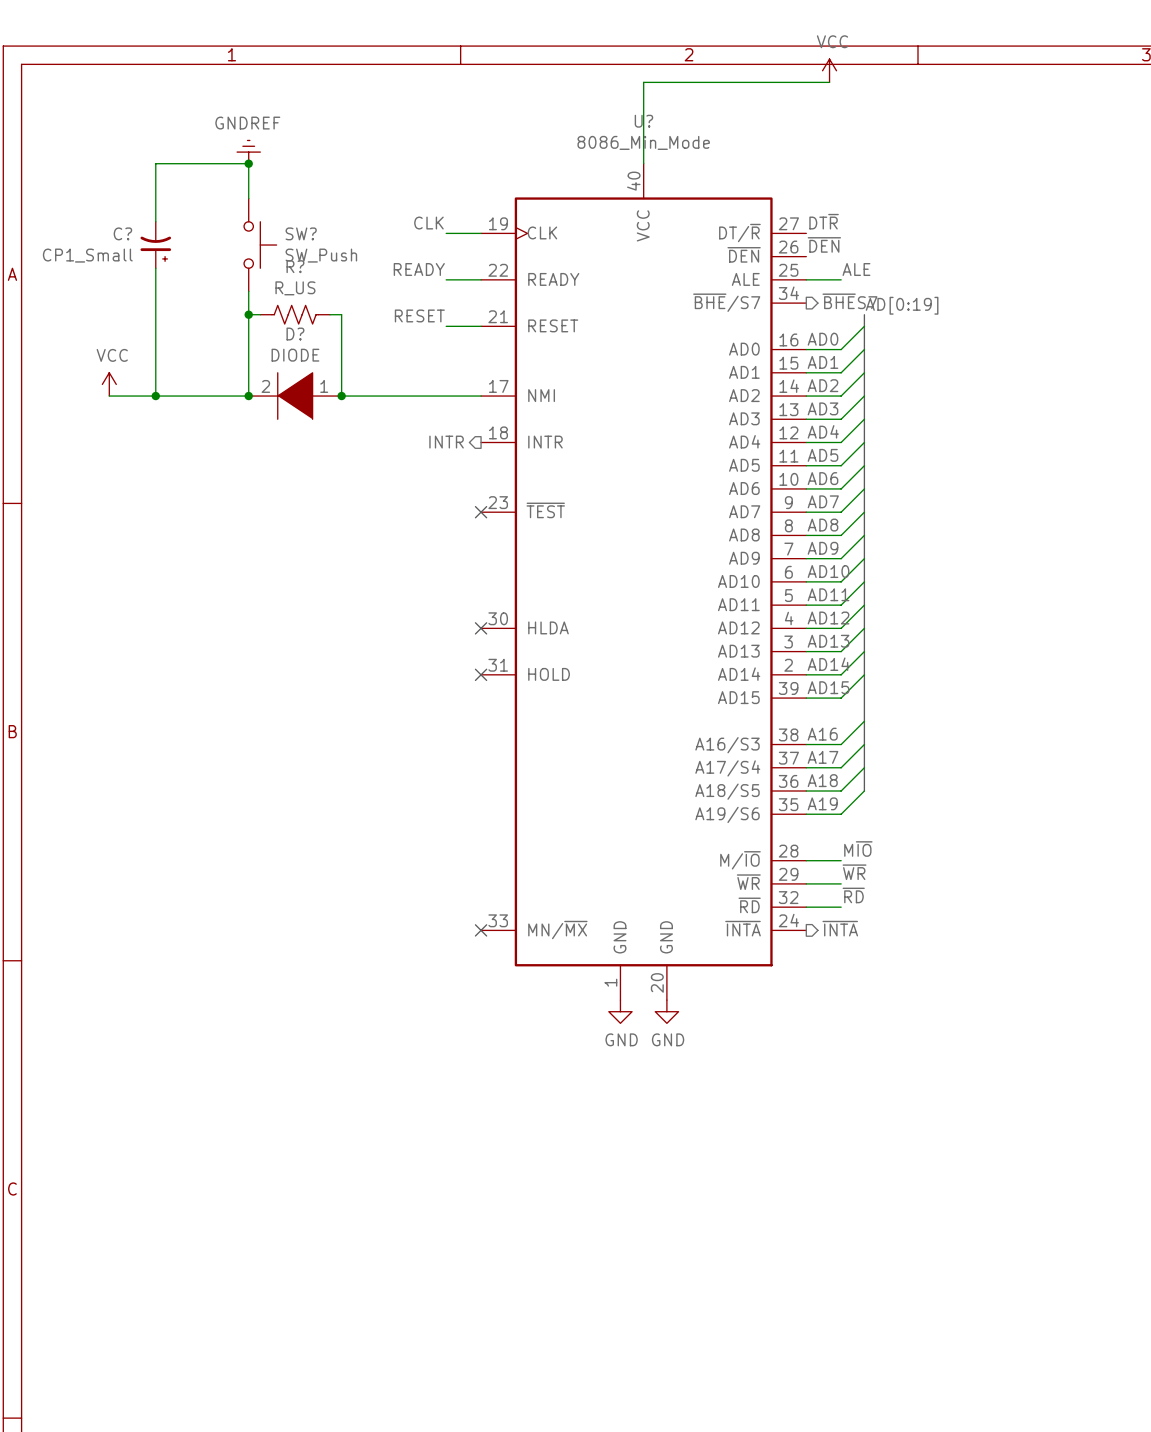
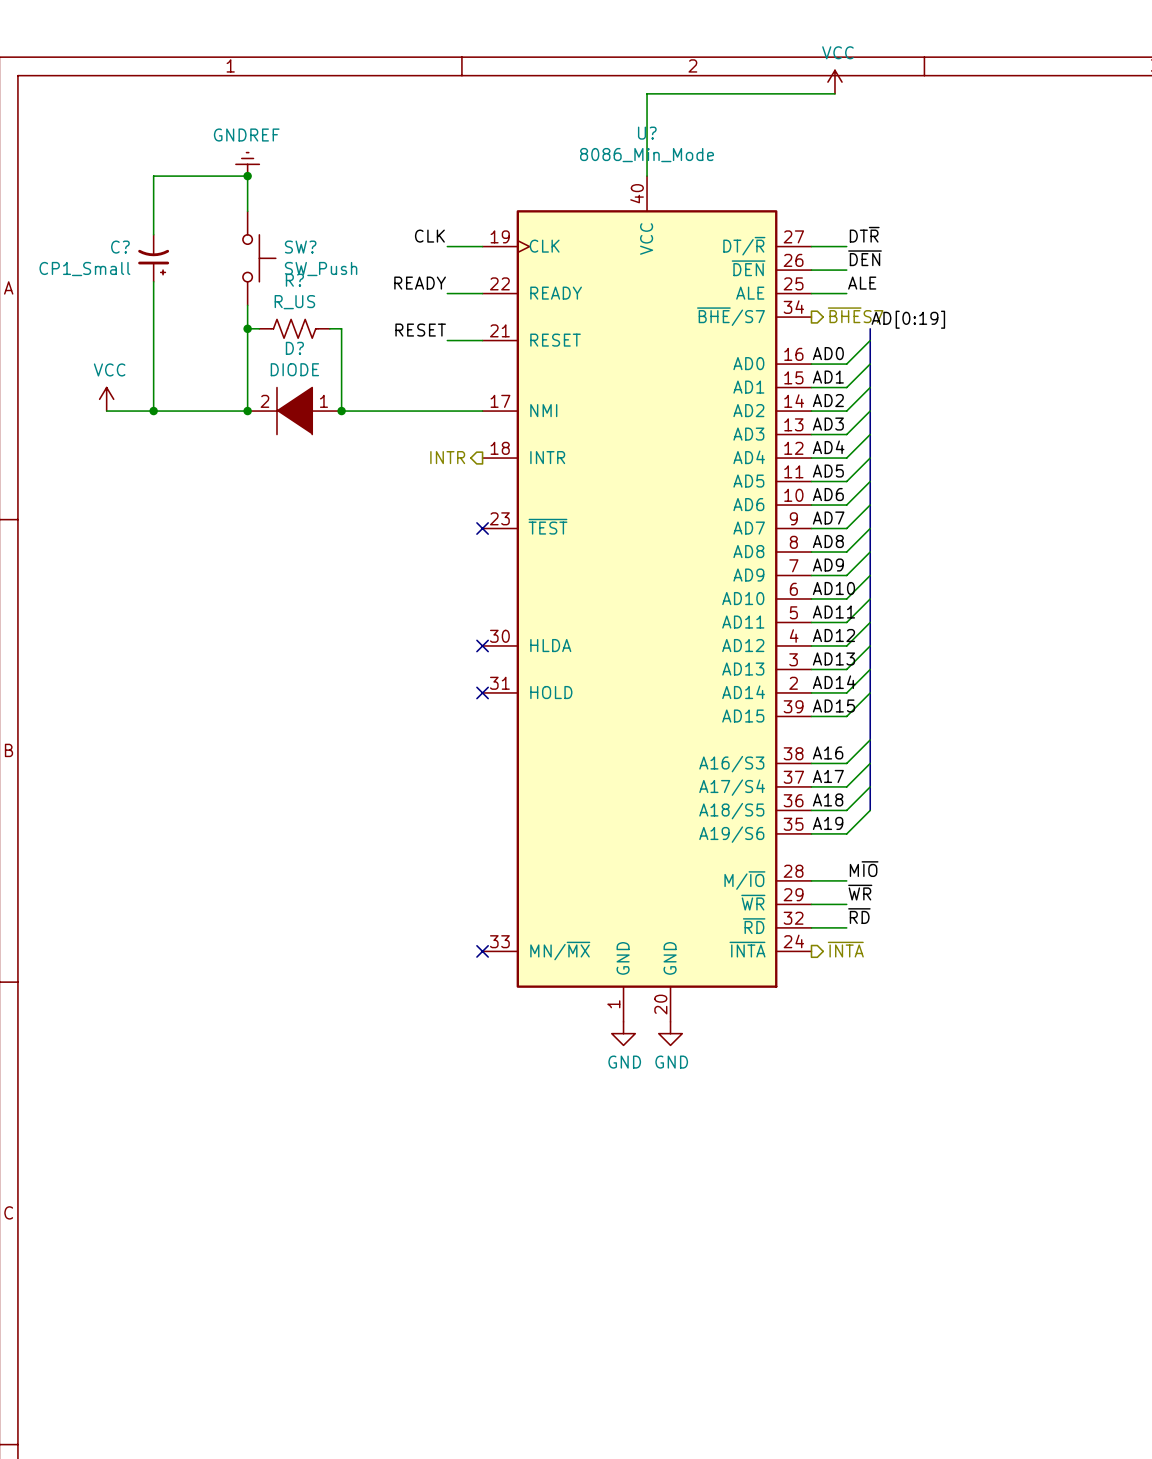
label position: DT~{R} (824, 221) -> DT~{R} (864, 234)
wire: none -> (811, 246) (846, 246)
label position: ~{DEN} (824, 244) -> ~{DEN} (864, 258)
wire: none -> (811, 270) (846, 270)

